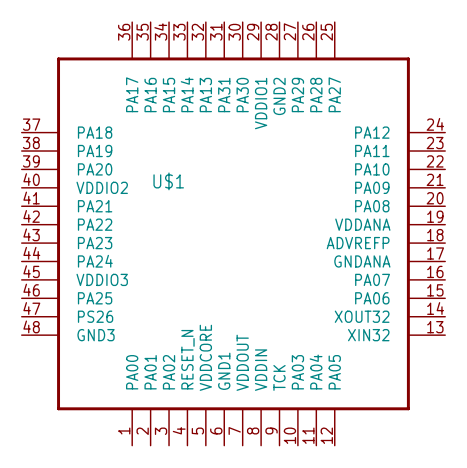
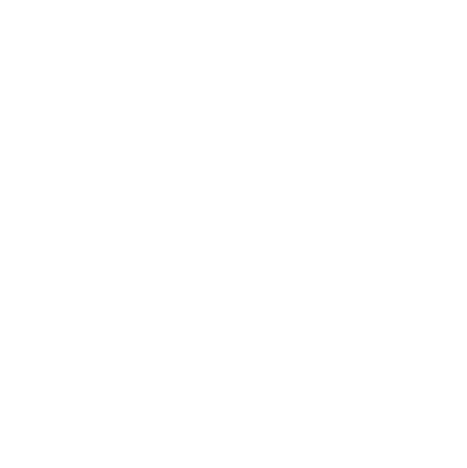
U$1: (233, 233) -> none

